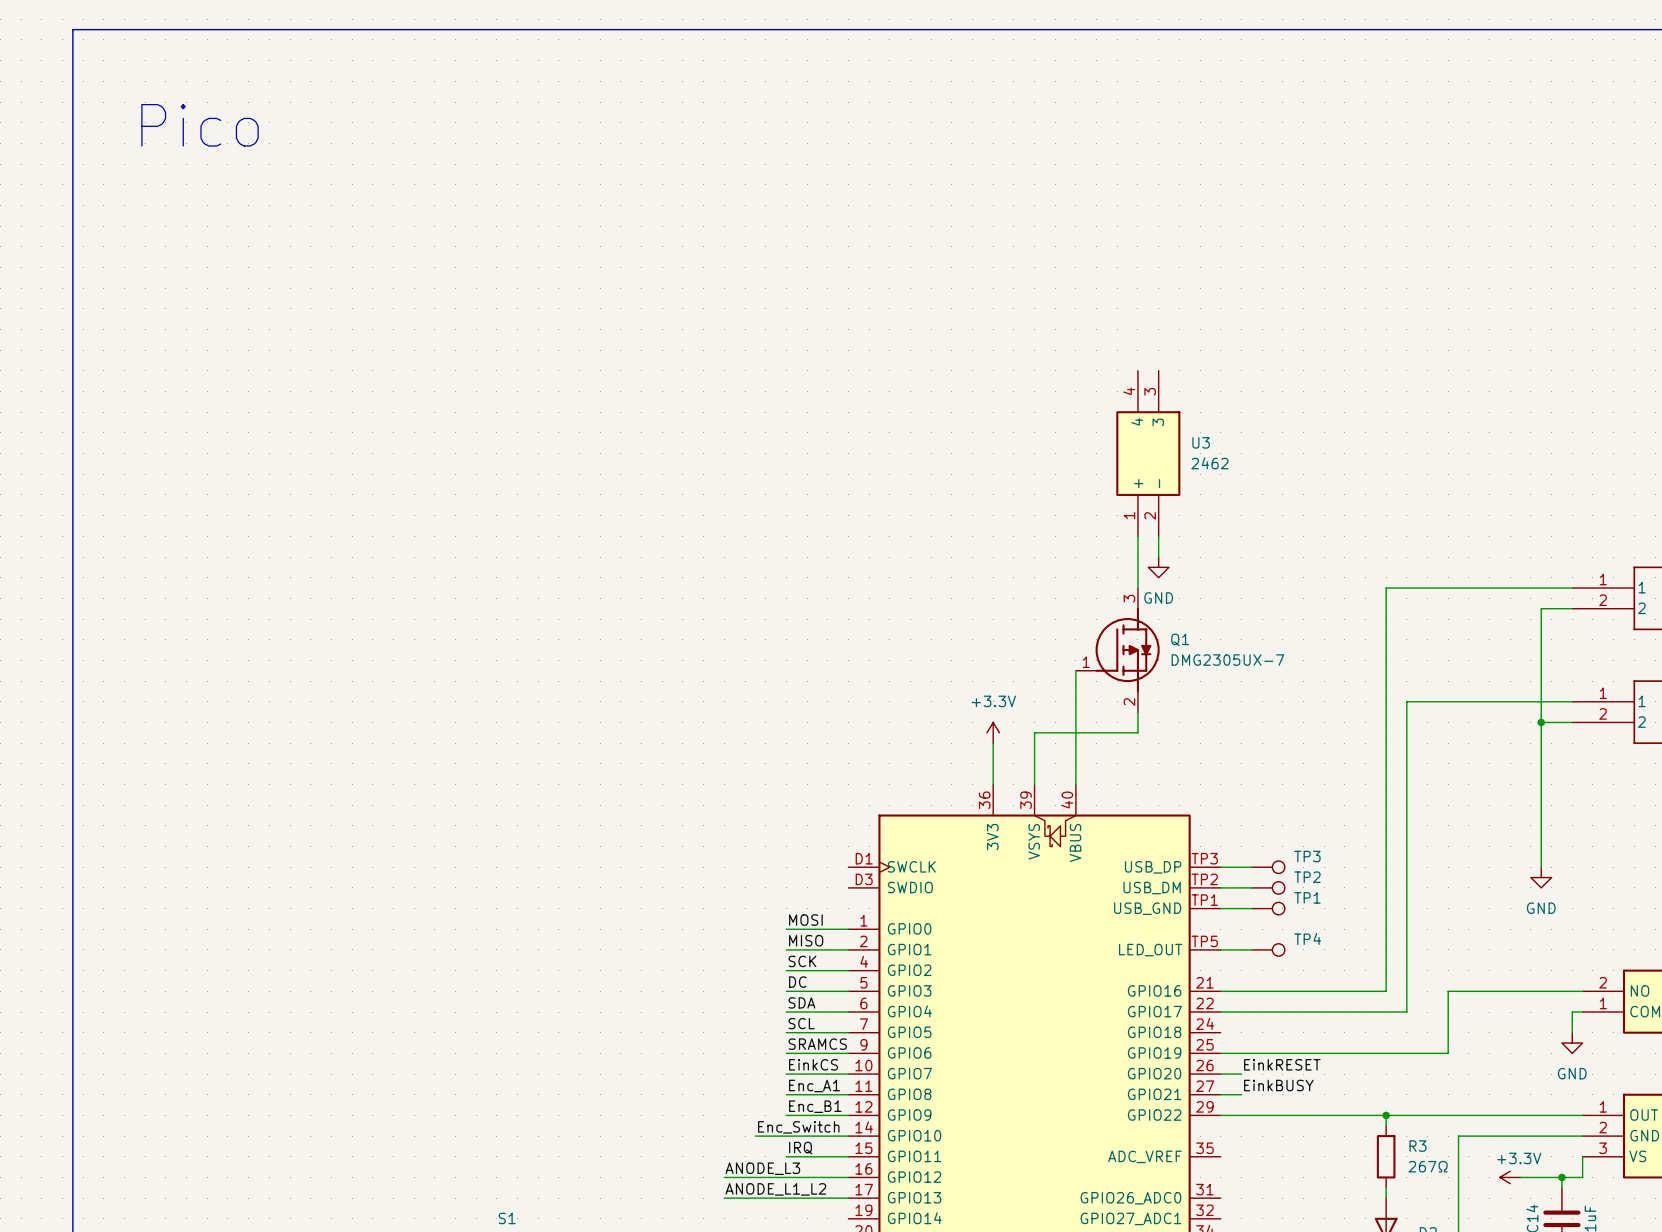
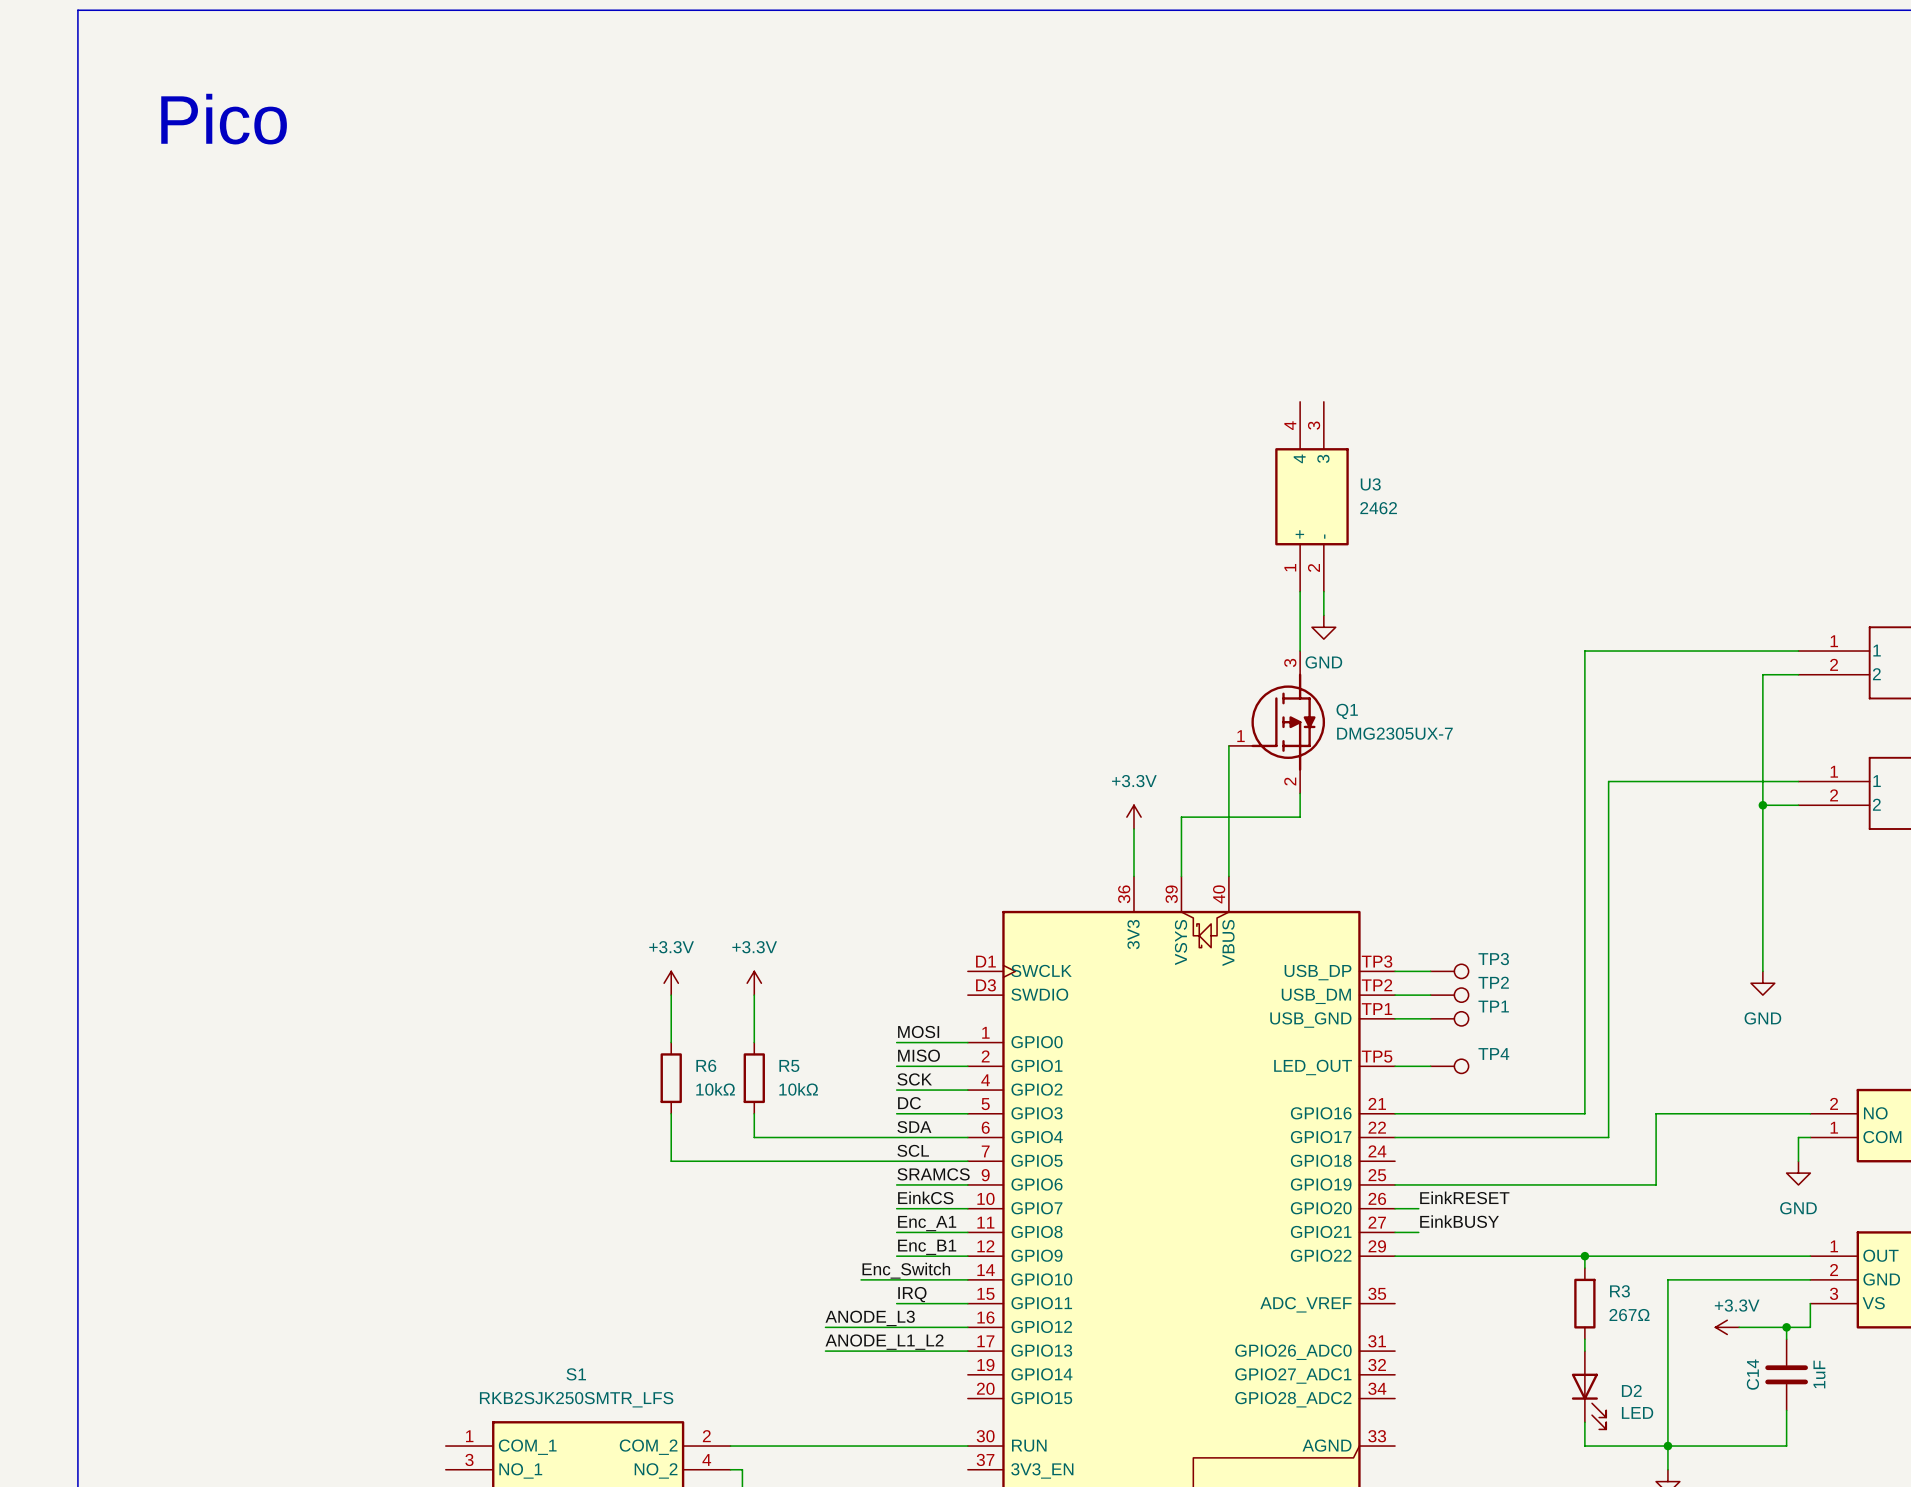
power symbol: none -> +3.3V (671, 983)
power symbol: none -> +3.3V (754, 983)
wire: none -> (671, 995) (671, 1042)
wire: none -> (754, 995) (754, 1042)
R6: none -> 10kΩ (671, 1078)
R5: none -> 10kΩ (754, 1078)
wire: none -> (671, 1113) (671, 1161) (896, 1161)
wire: none -> (754, 1113) (754, 1137) (896, 1137)

